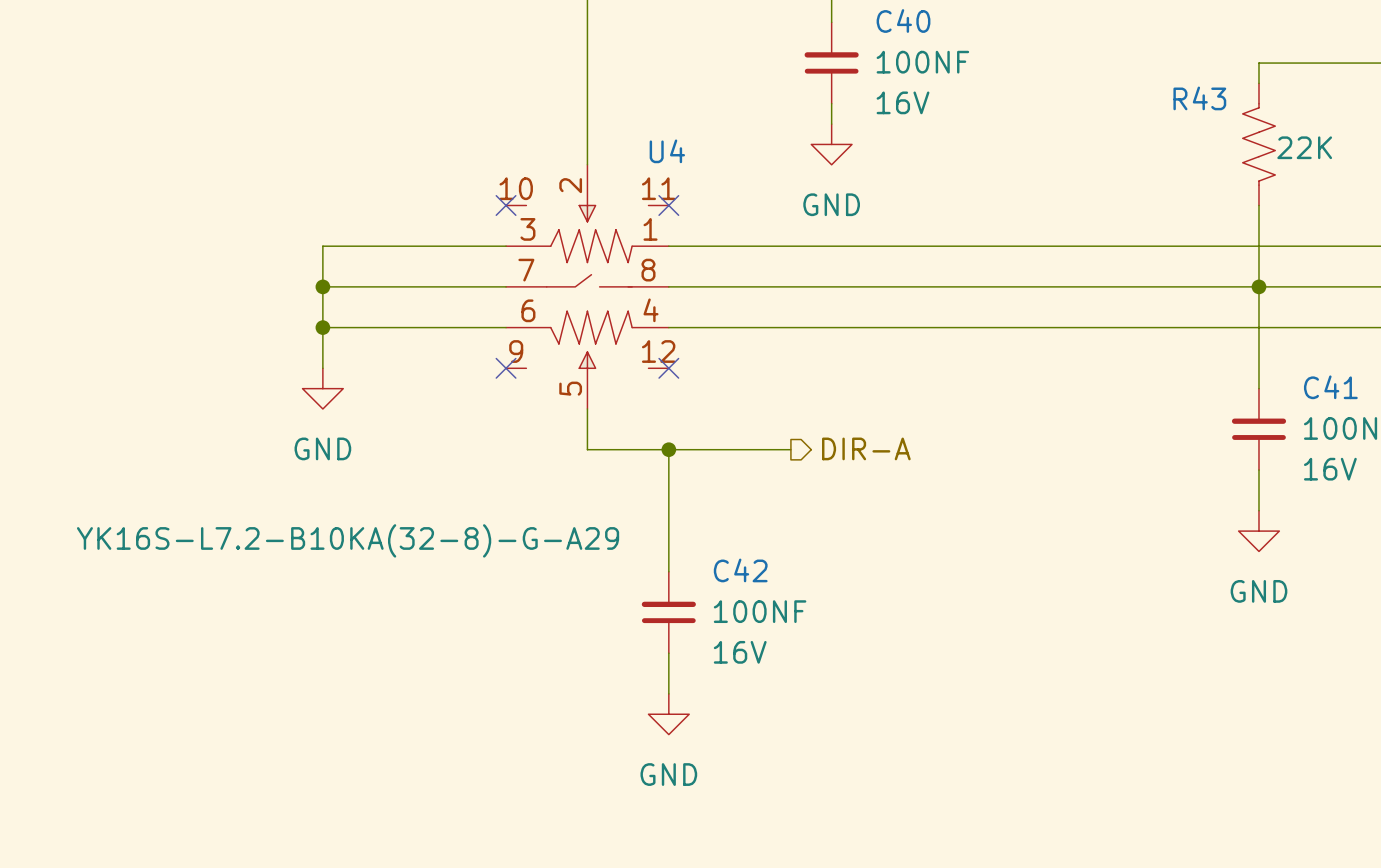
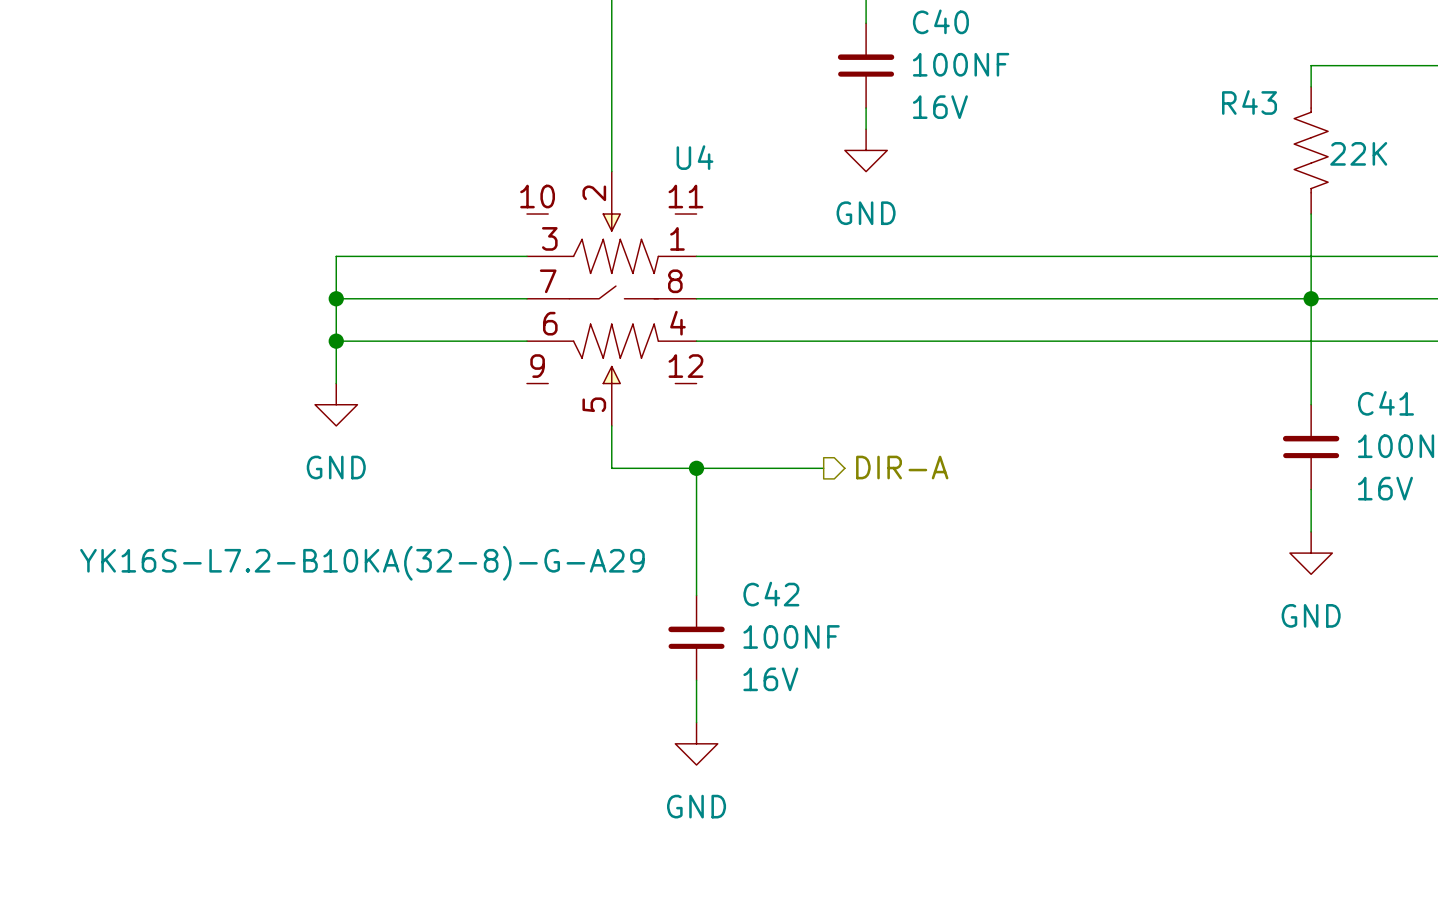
no-connect mark: (506, 205) -> none
no-connect mark: (668, 205) -> none
no-connect mark: (506, 368) -> none
no-connect mark: (668, 368) -> none

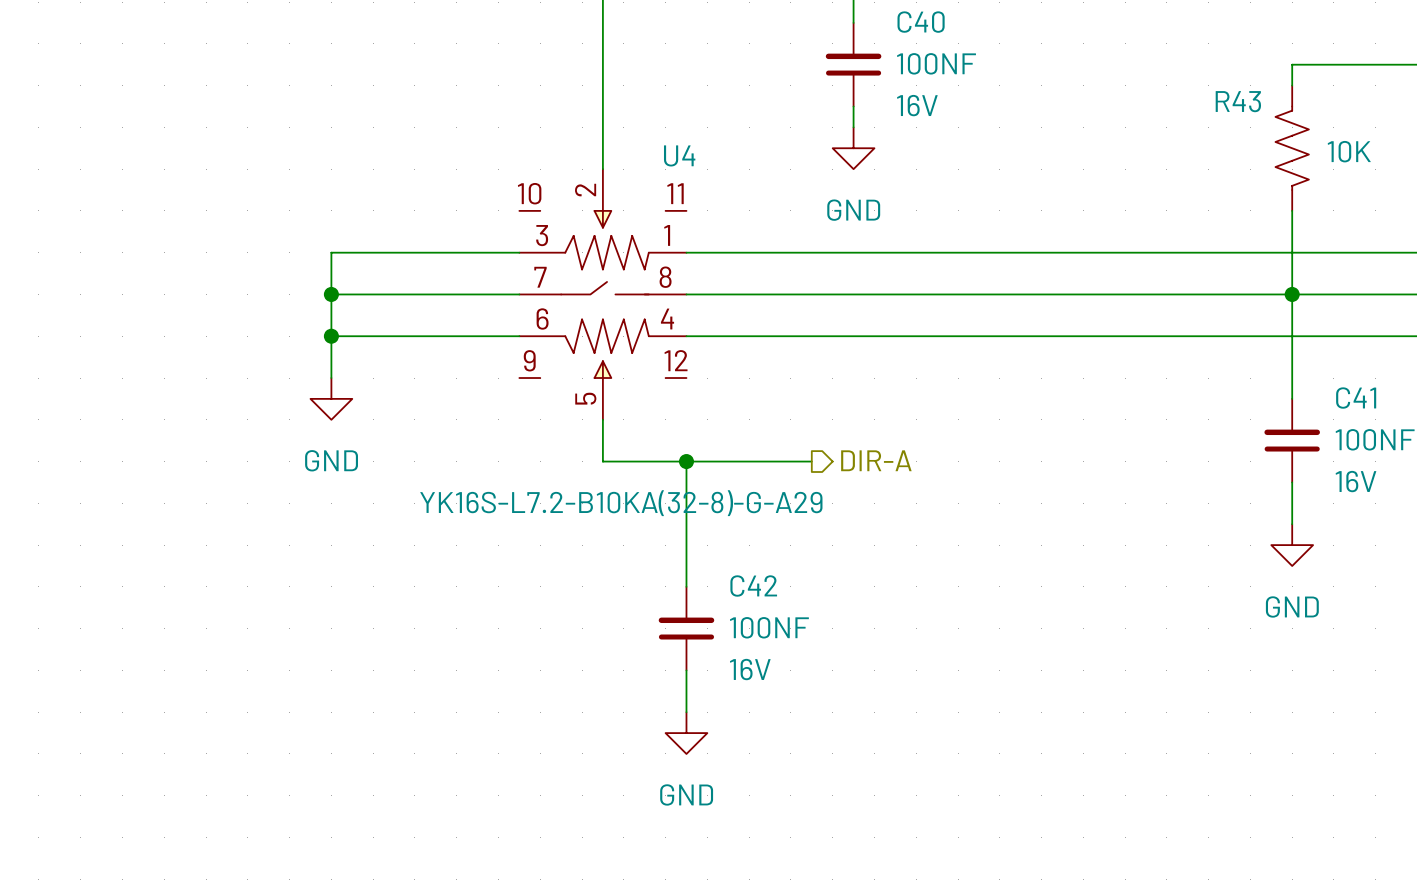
R43 value: 22K (1358, 153) -> 10K (1349, 151)
U4 value position: YK16S-L7.2-B10KA(32-8)-G-A29 (362, 563) -> YK16S-L7.2-B10KA(32-8)-G-A29 (621, 503)

